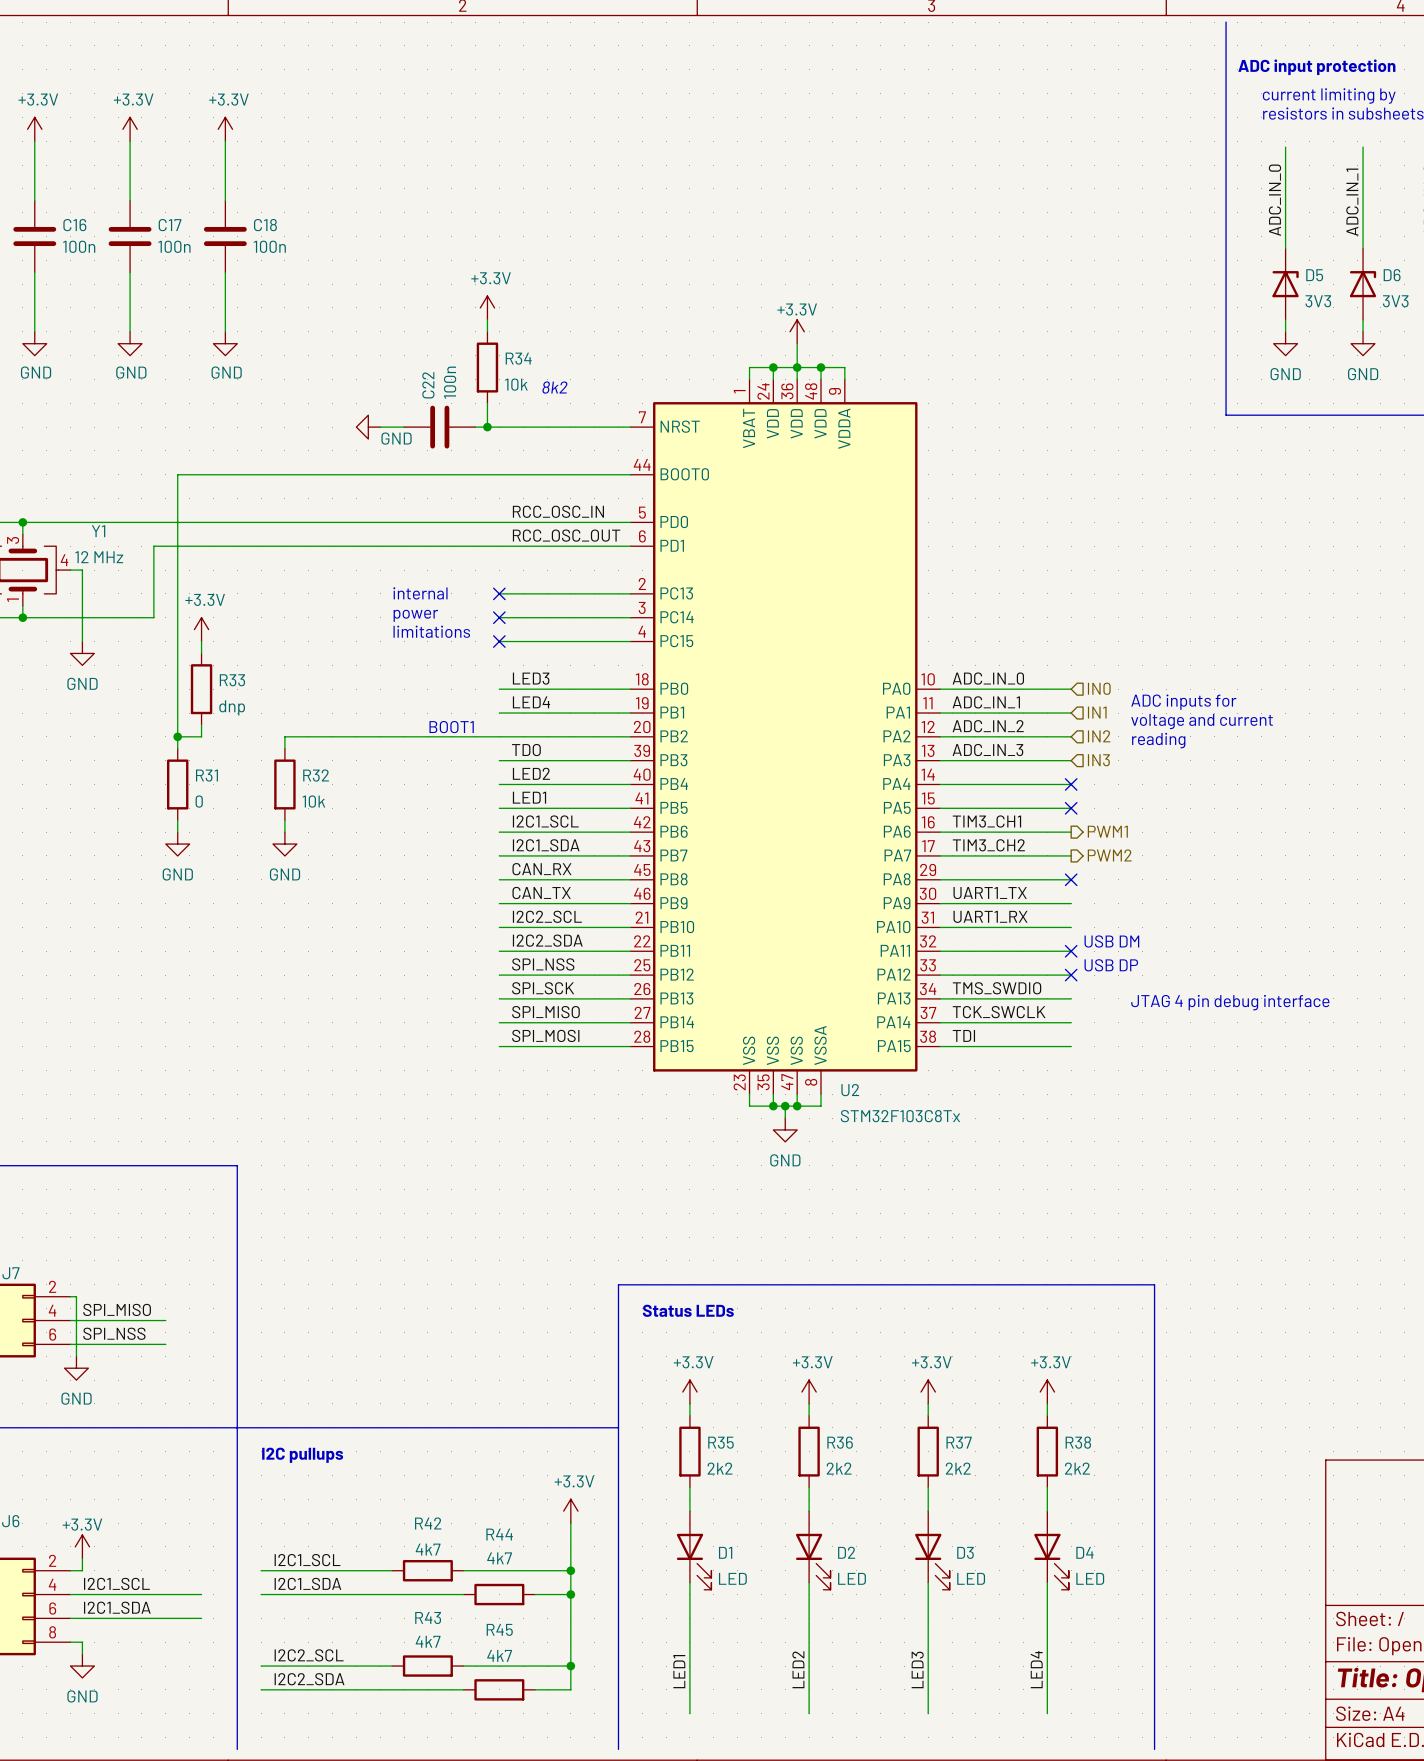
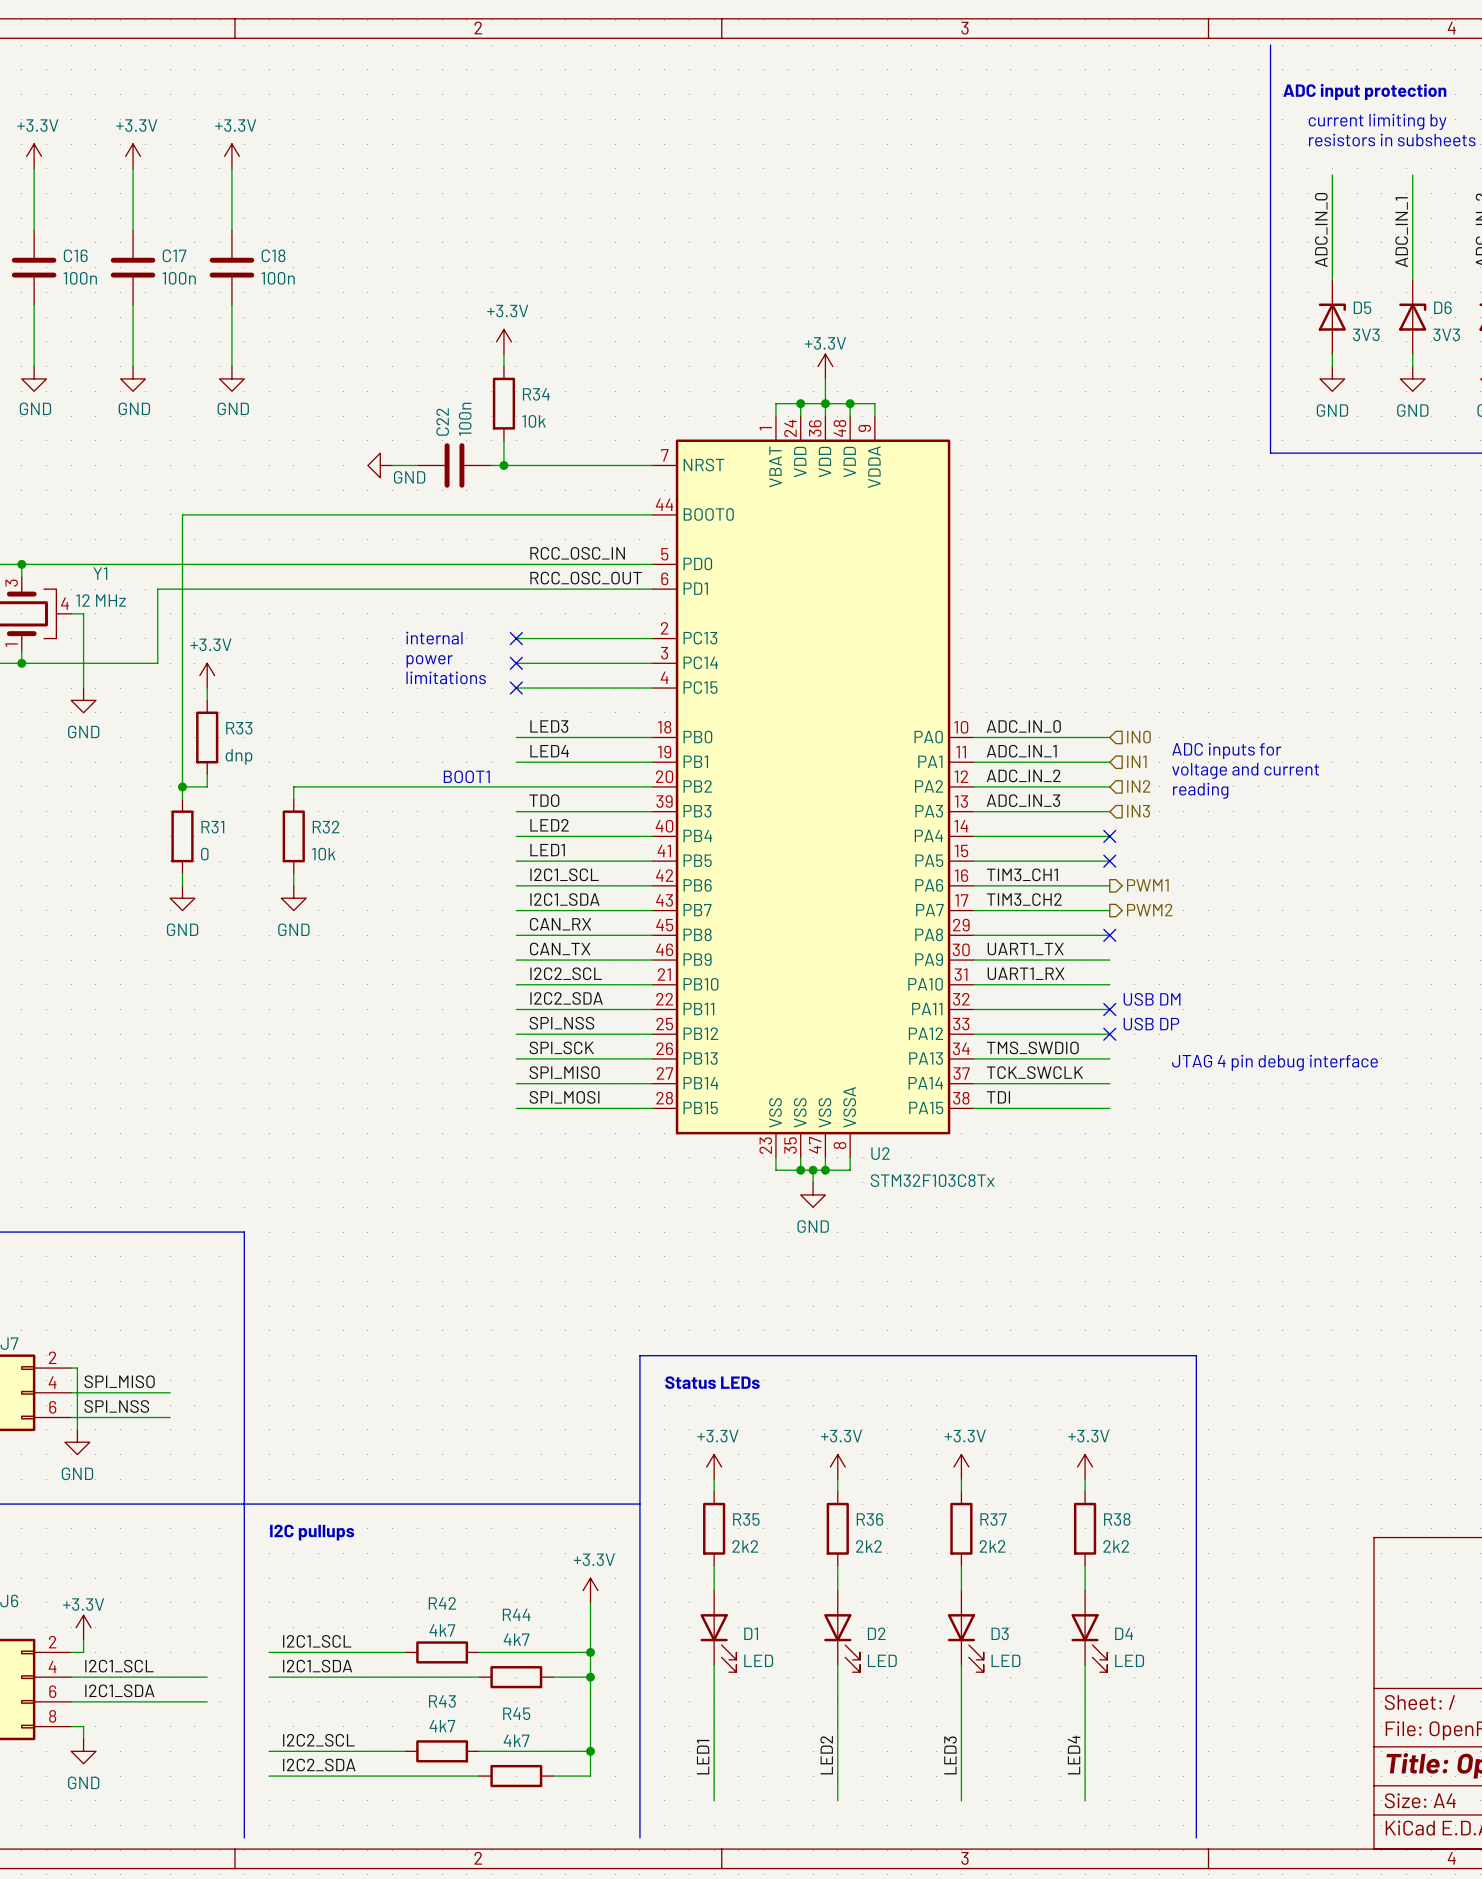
text: 8k2 (554, 387) -> none

